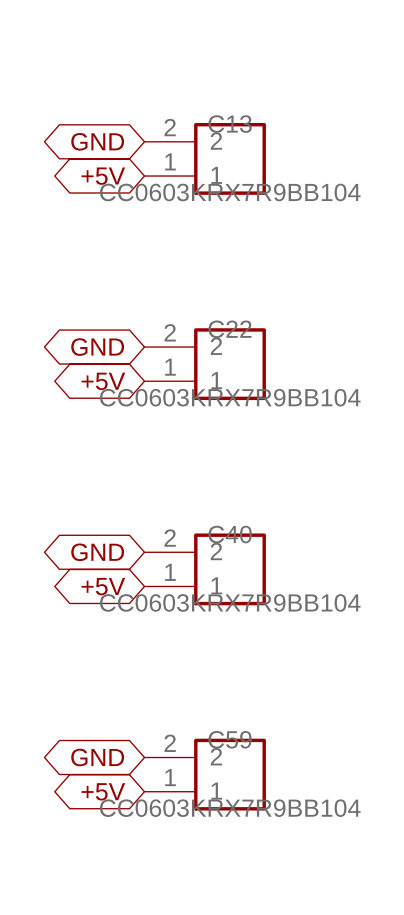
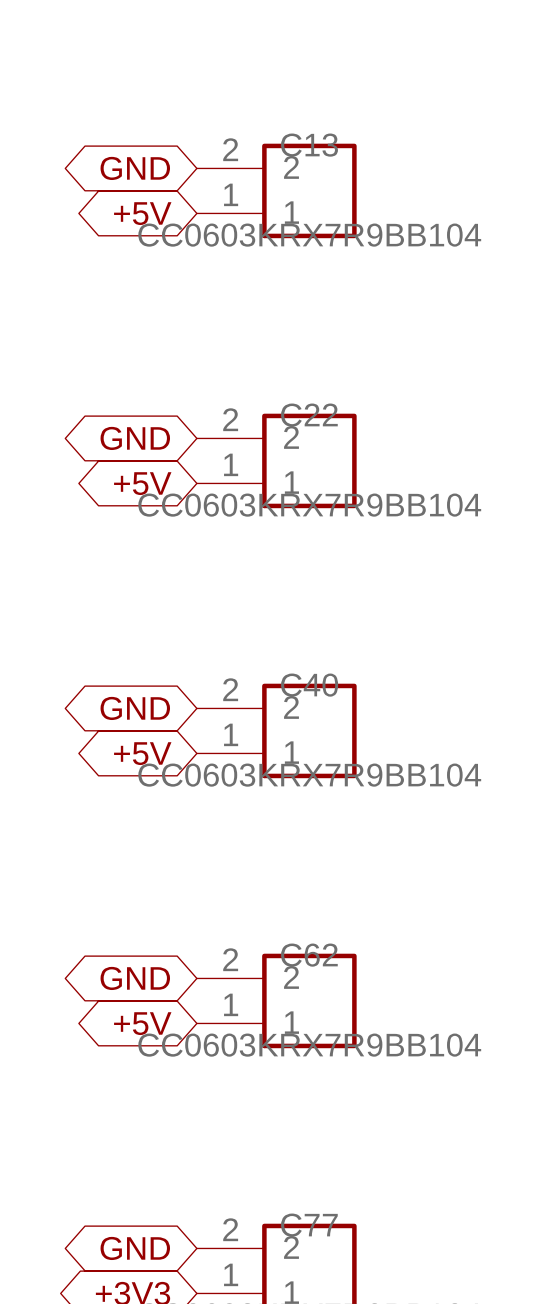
C59 name: C59 (230, 739) -> C62 (309, 955)

